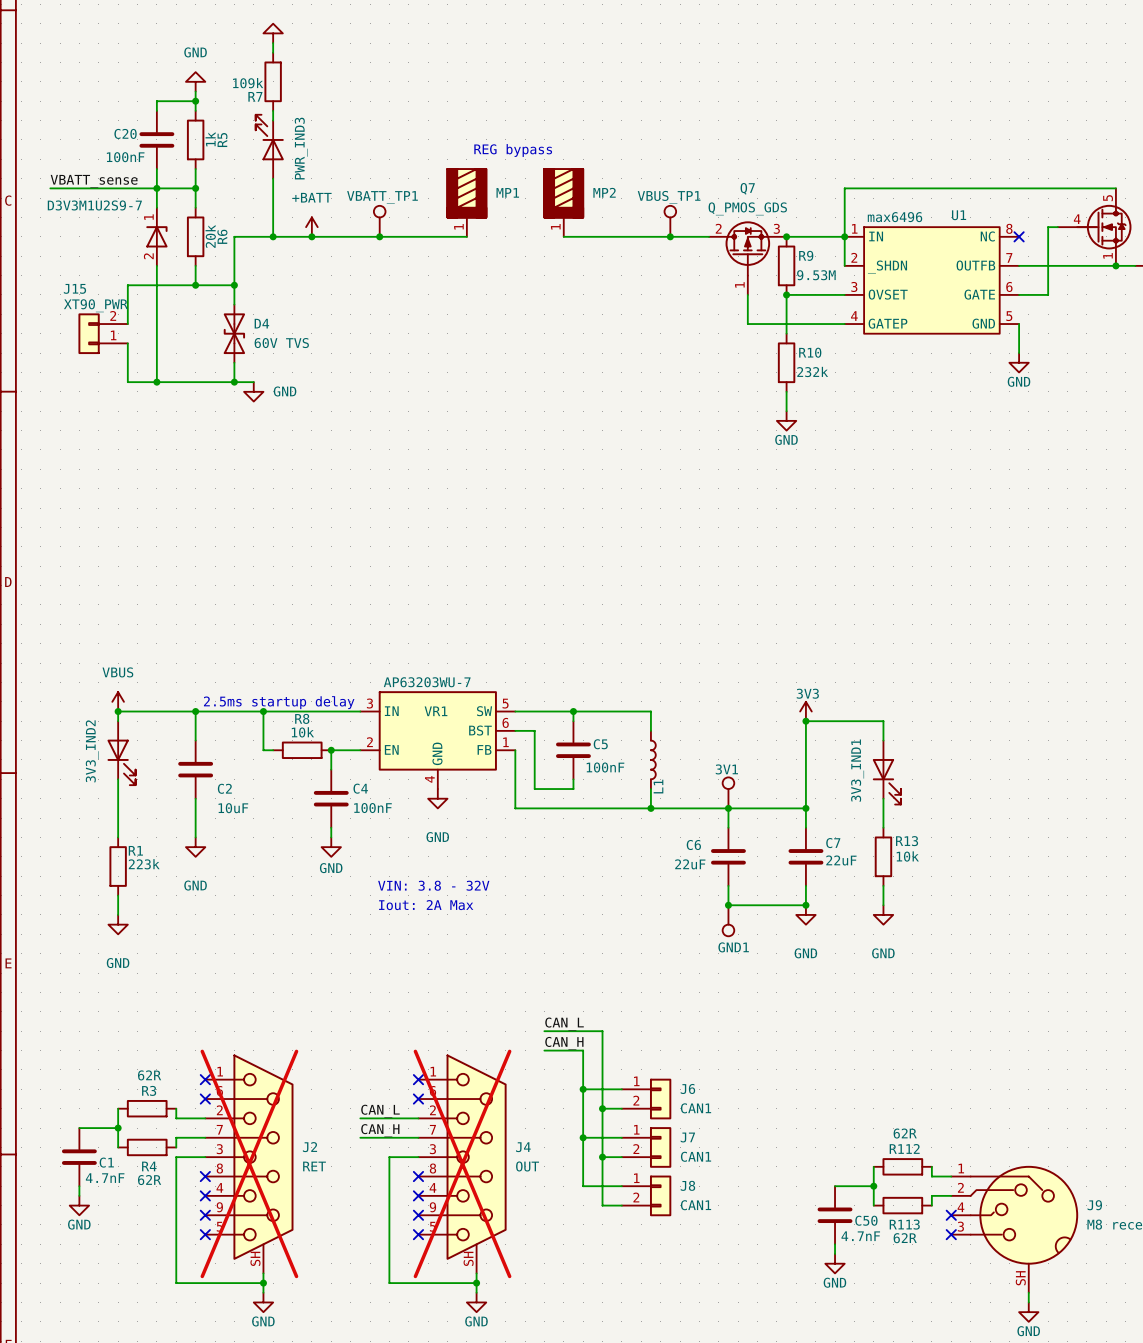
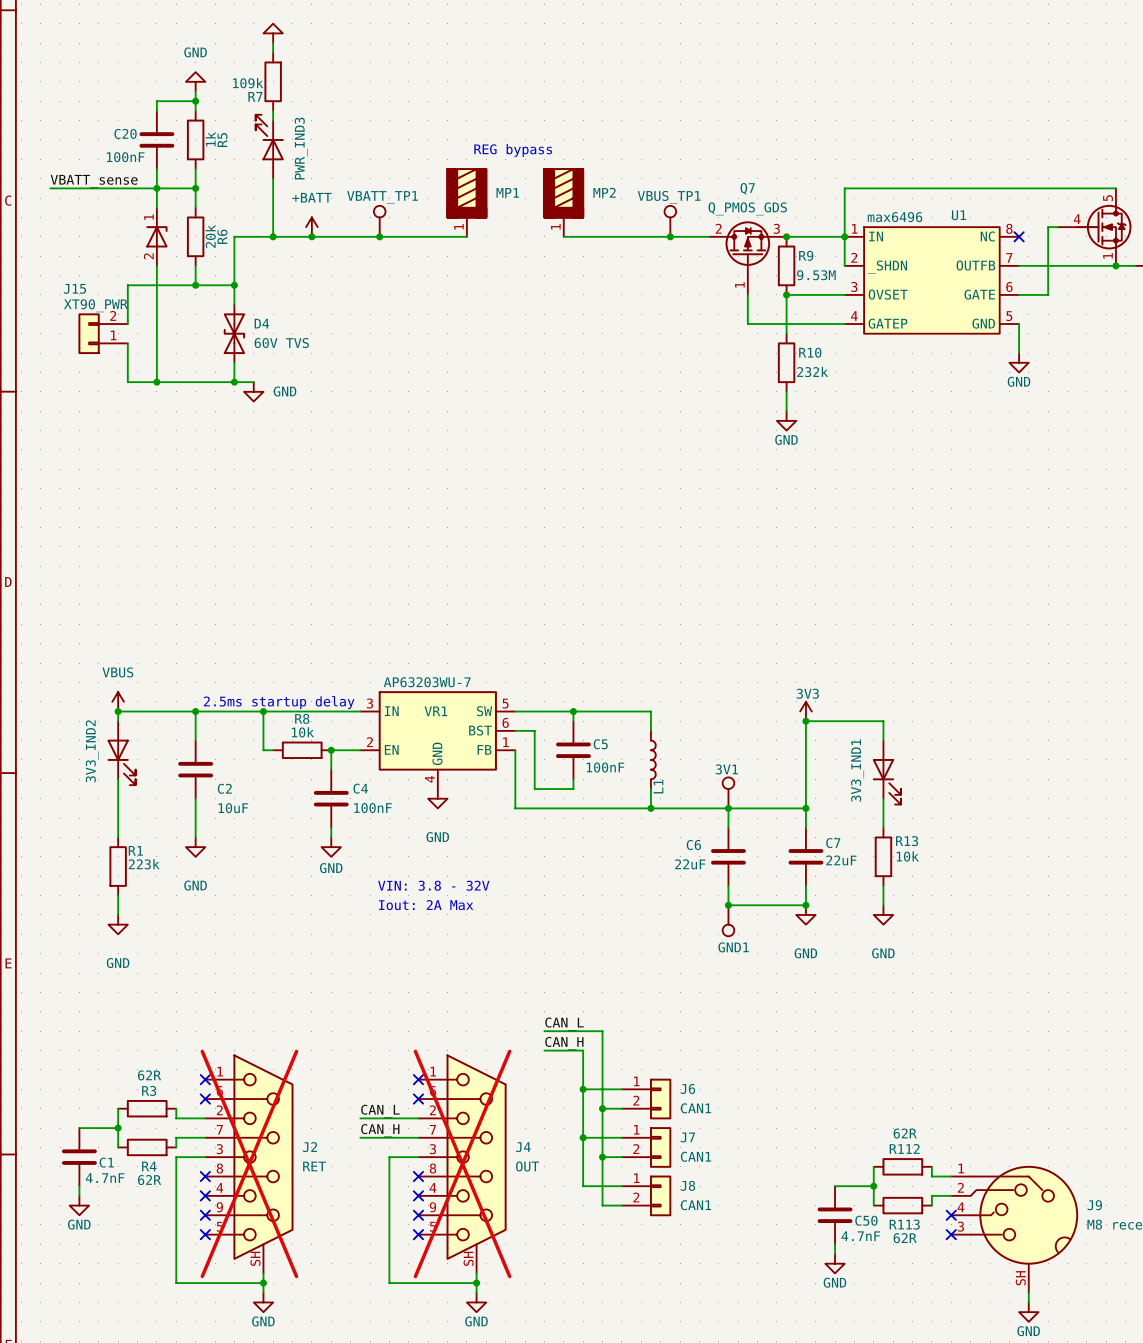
part value: D3V3M1U2S9-7 (94, 205) -> none

